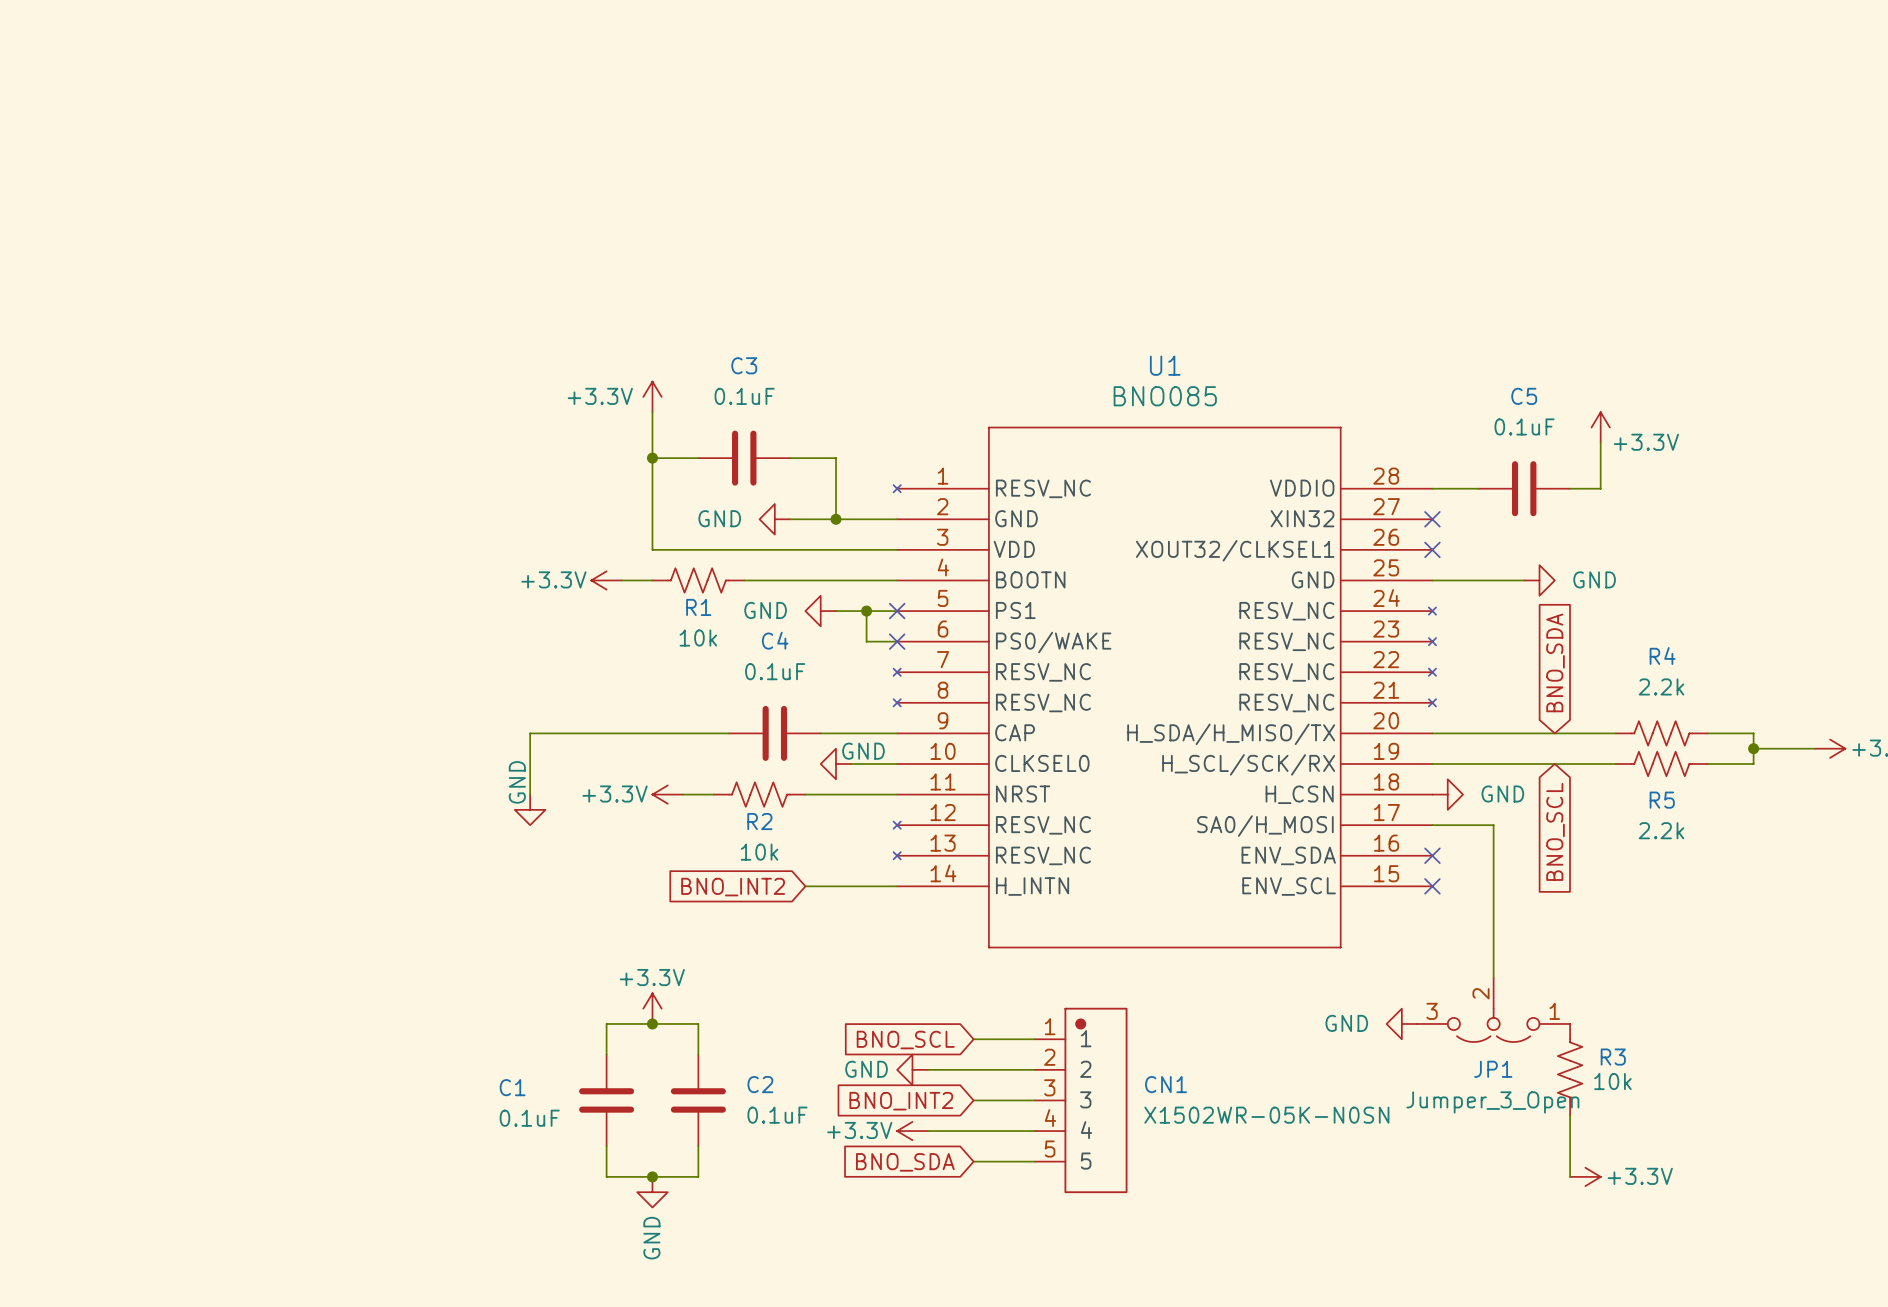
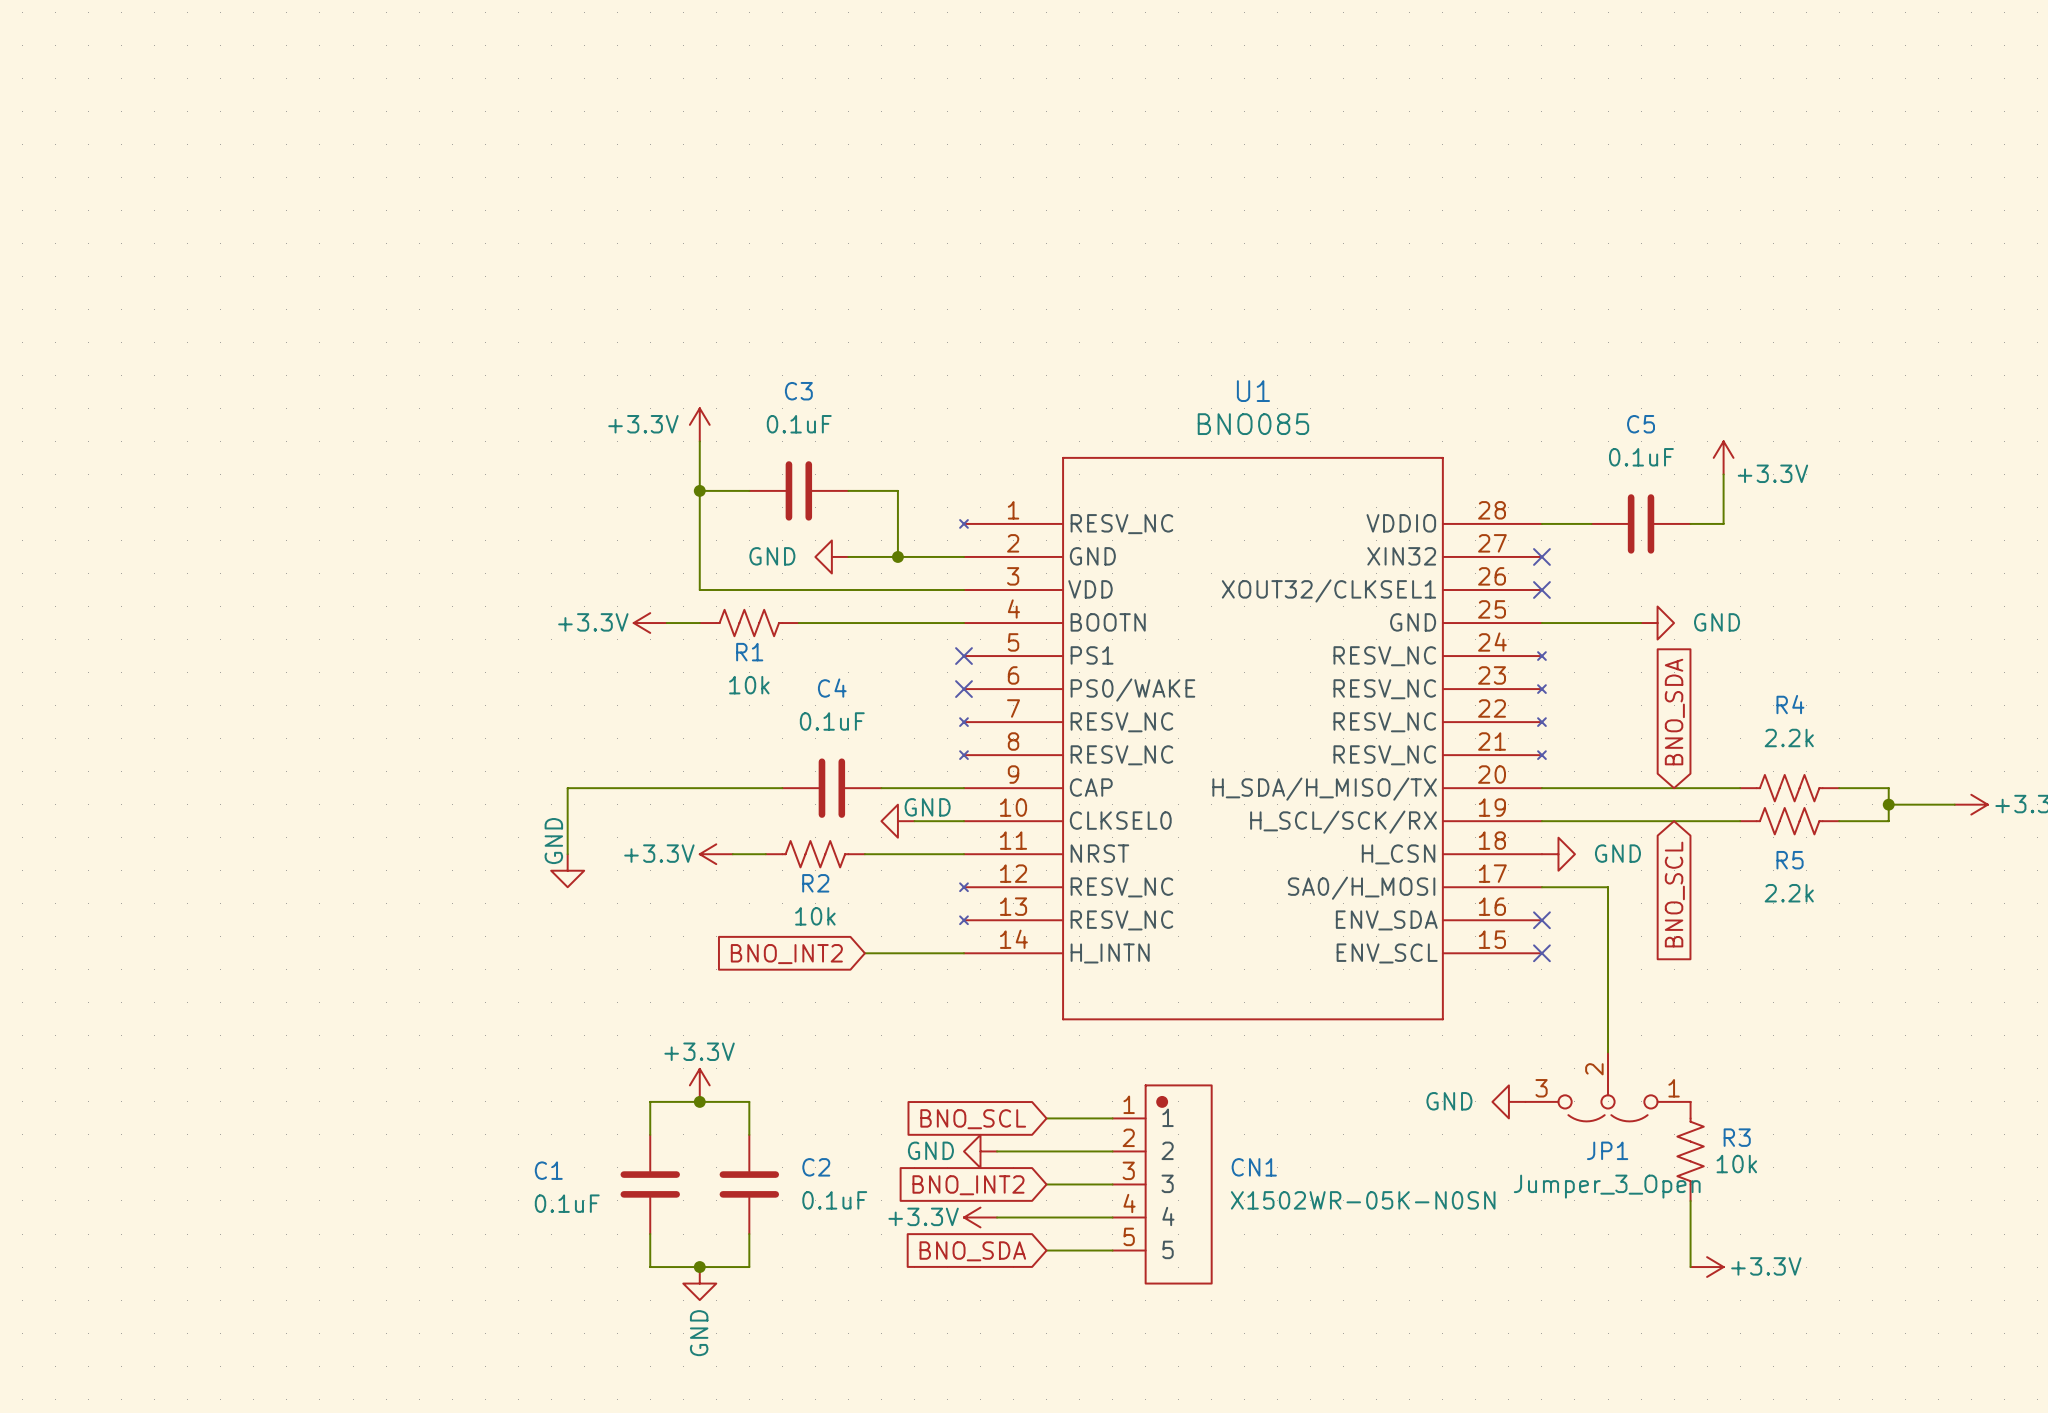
power symbol: GND (820, 611) -> none
wire: (836, 611) (897, 611) -> none
wire: (866, 611) (866, 641) (897, 641) -> none
junction: (866, 611) -> none

